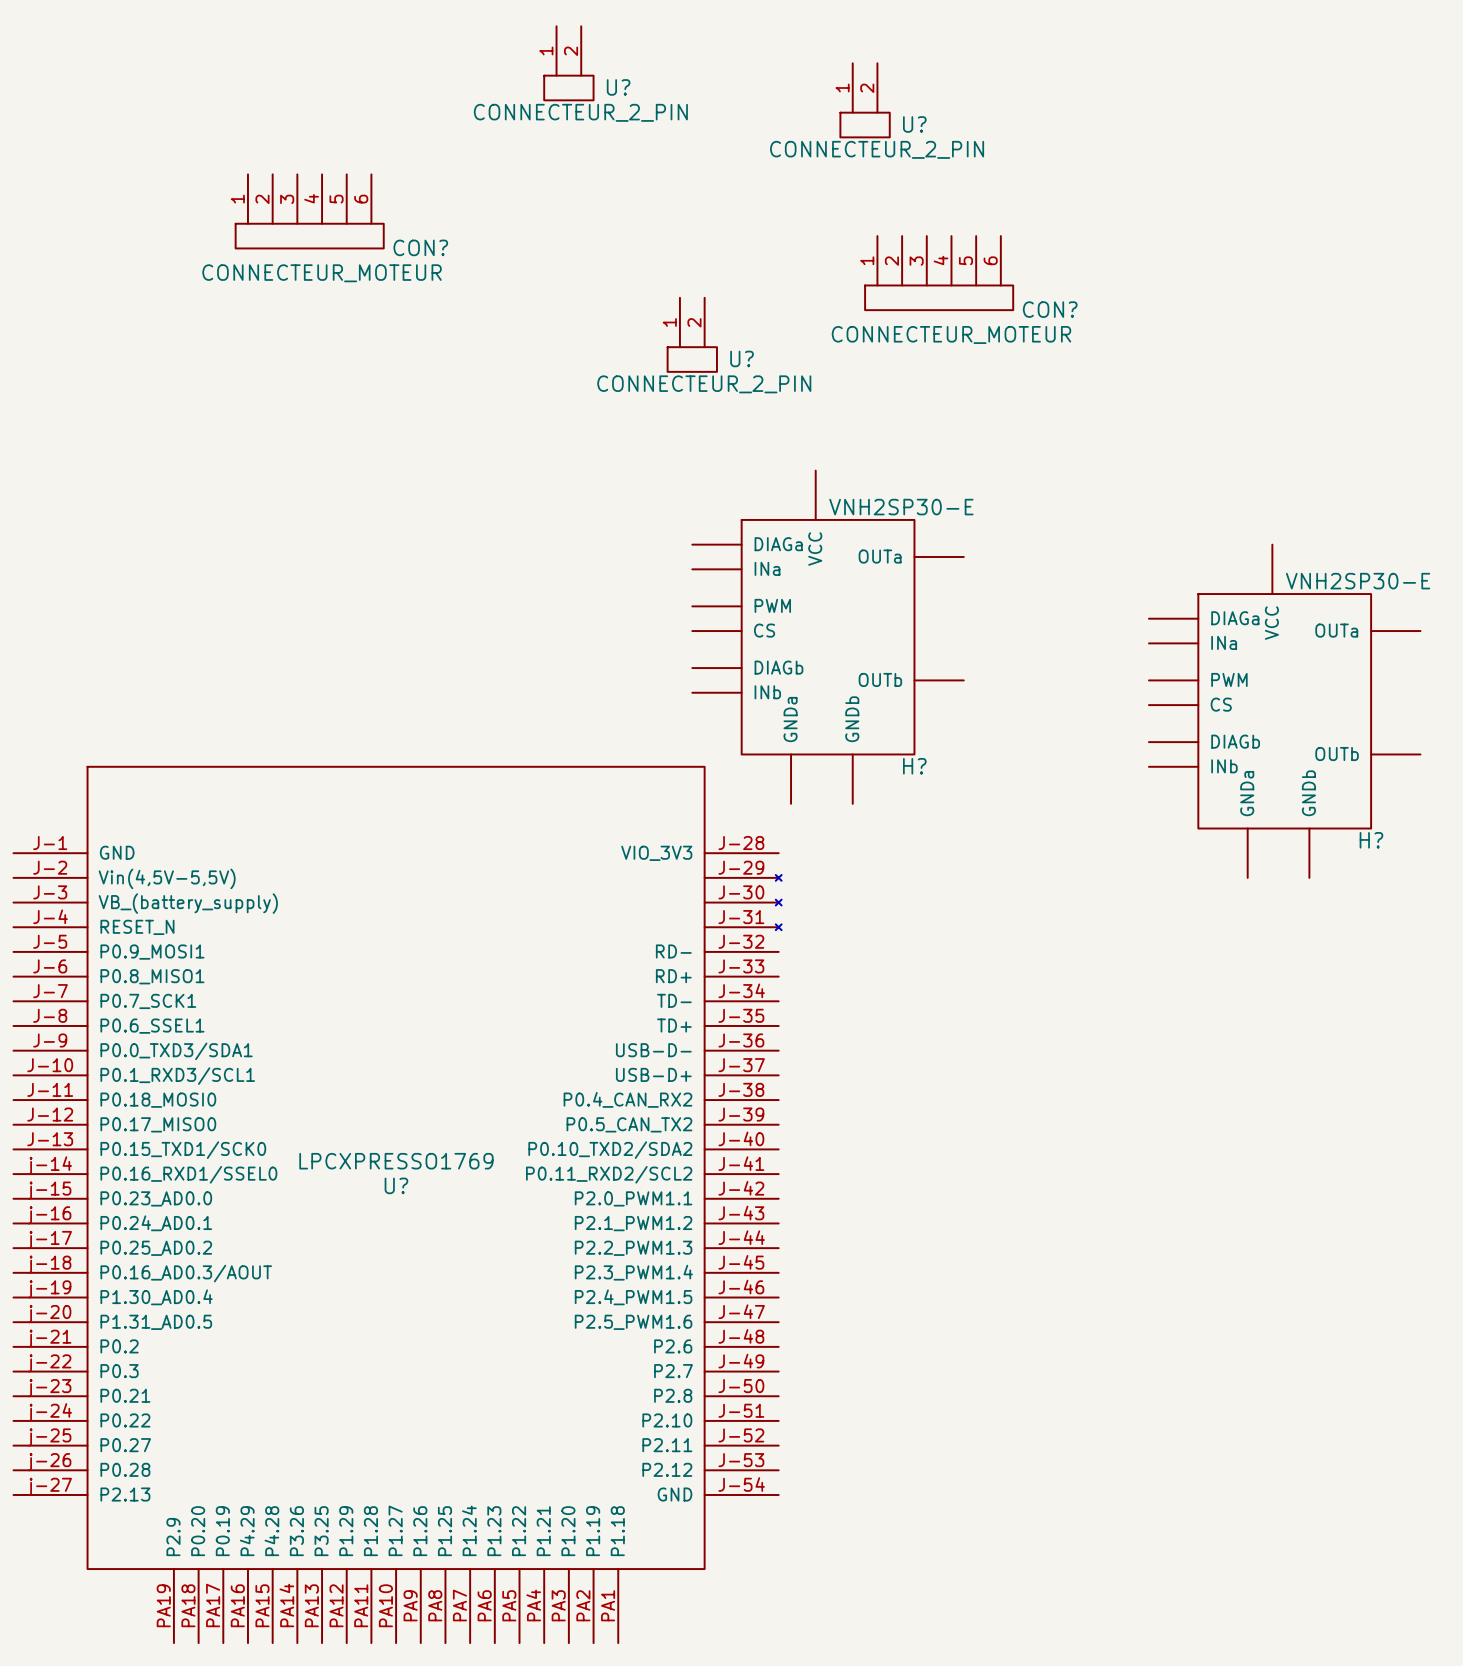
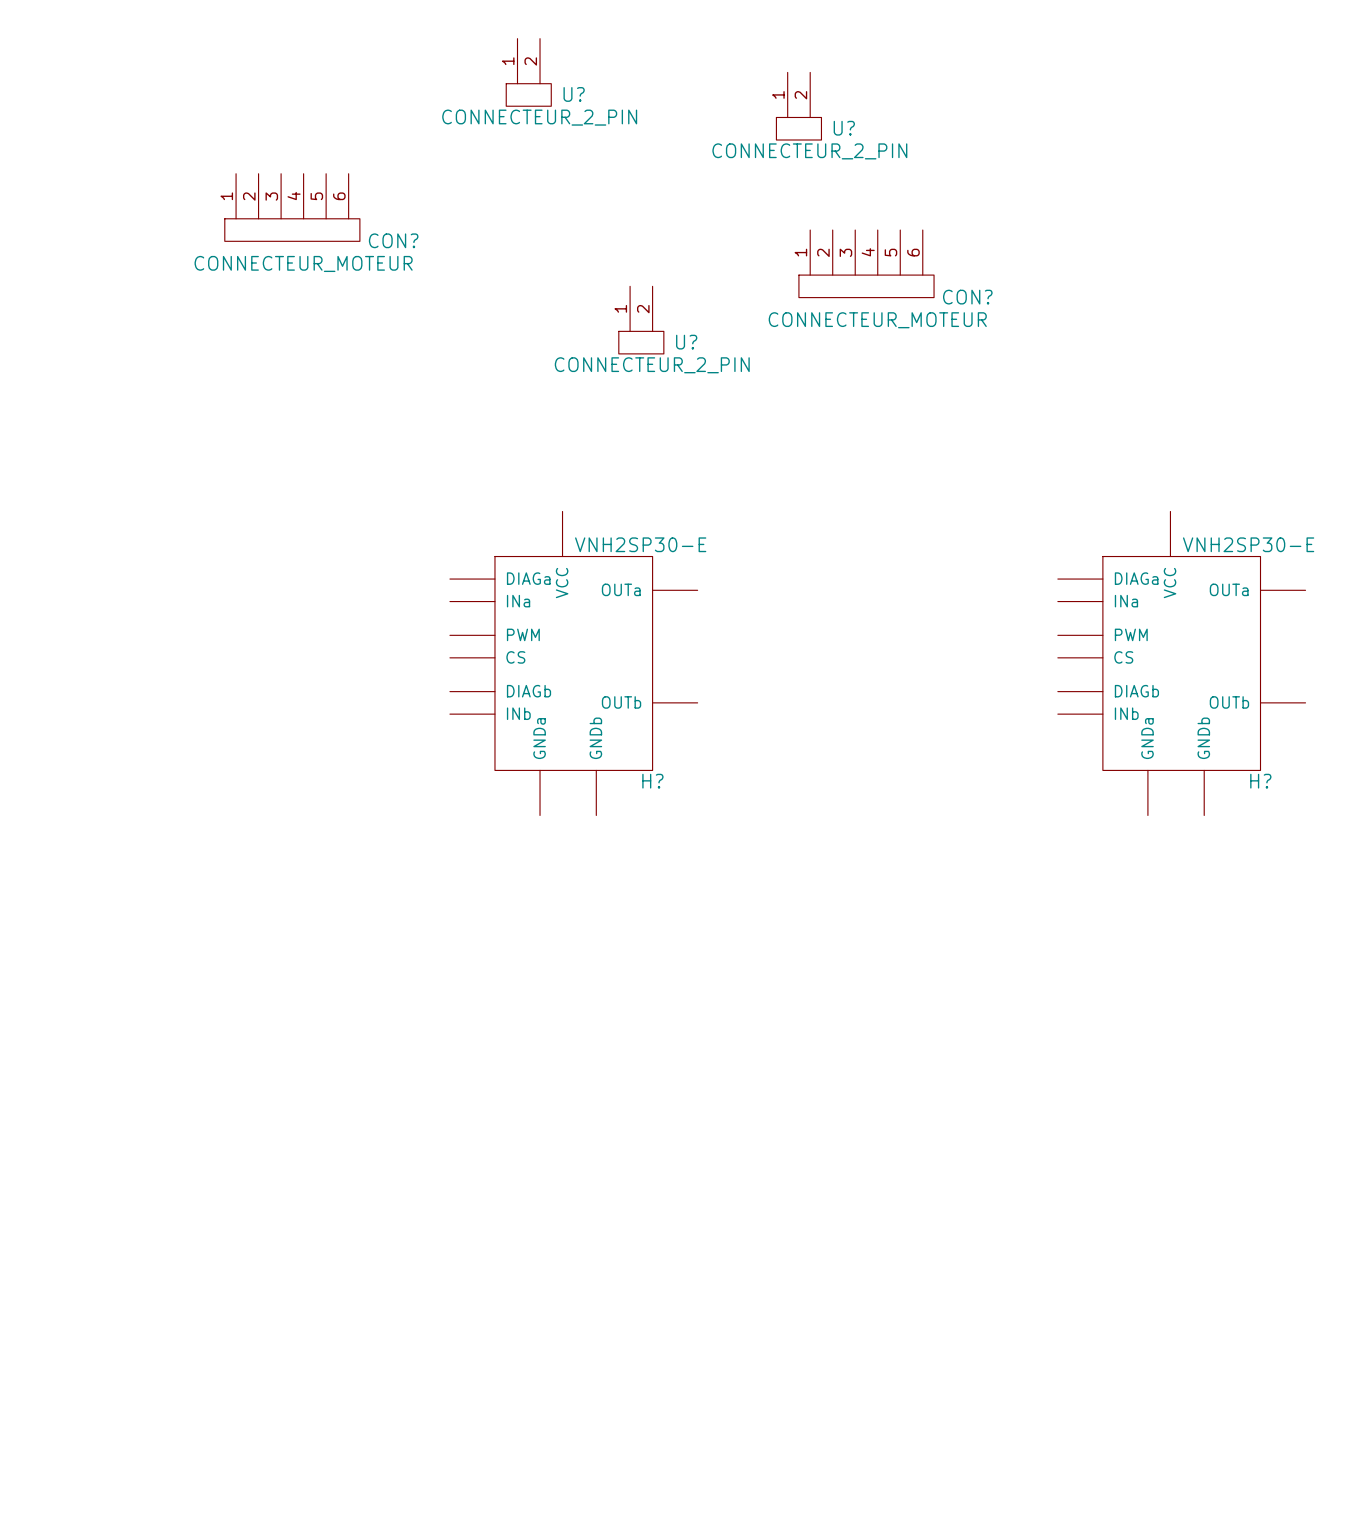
H? position: (828, 637) -> (573, 663)
U?: LPCXPRESSO1769 (397, 1204) -> none

